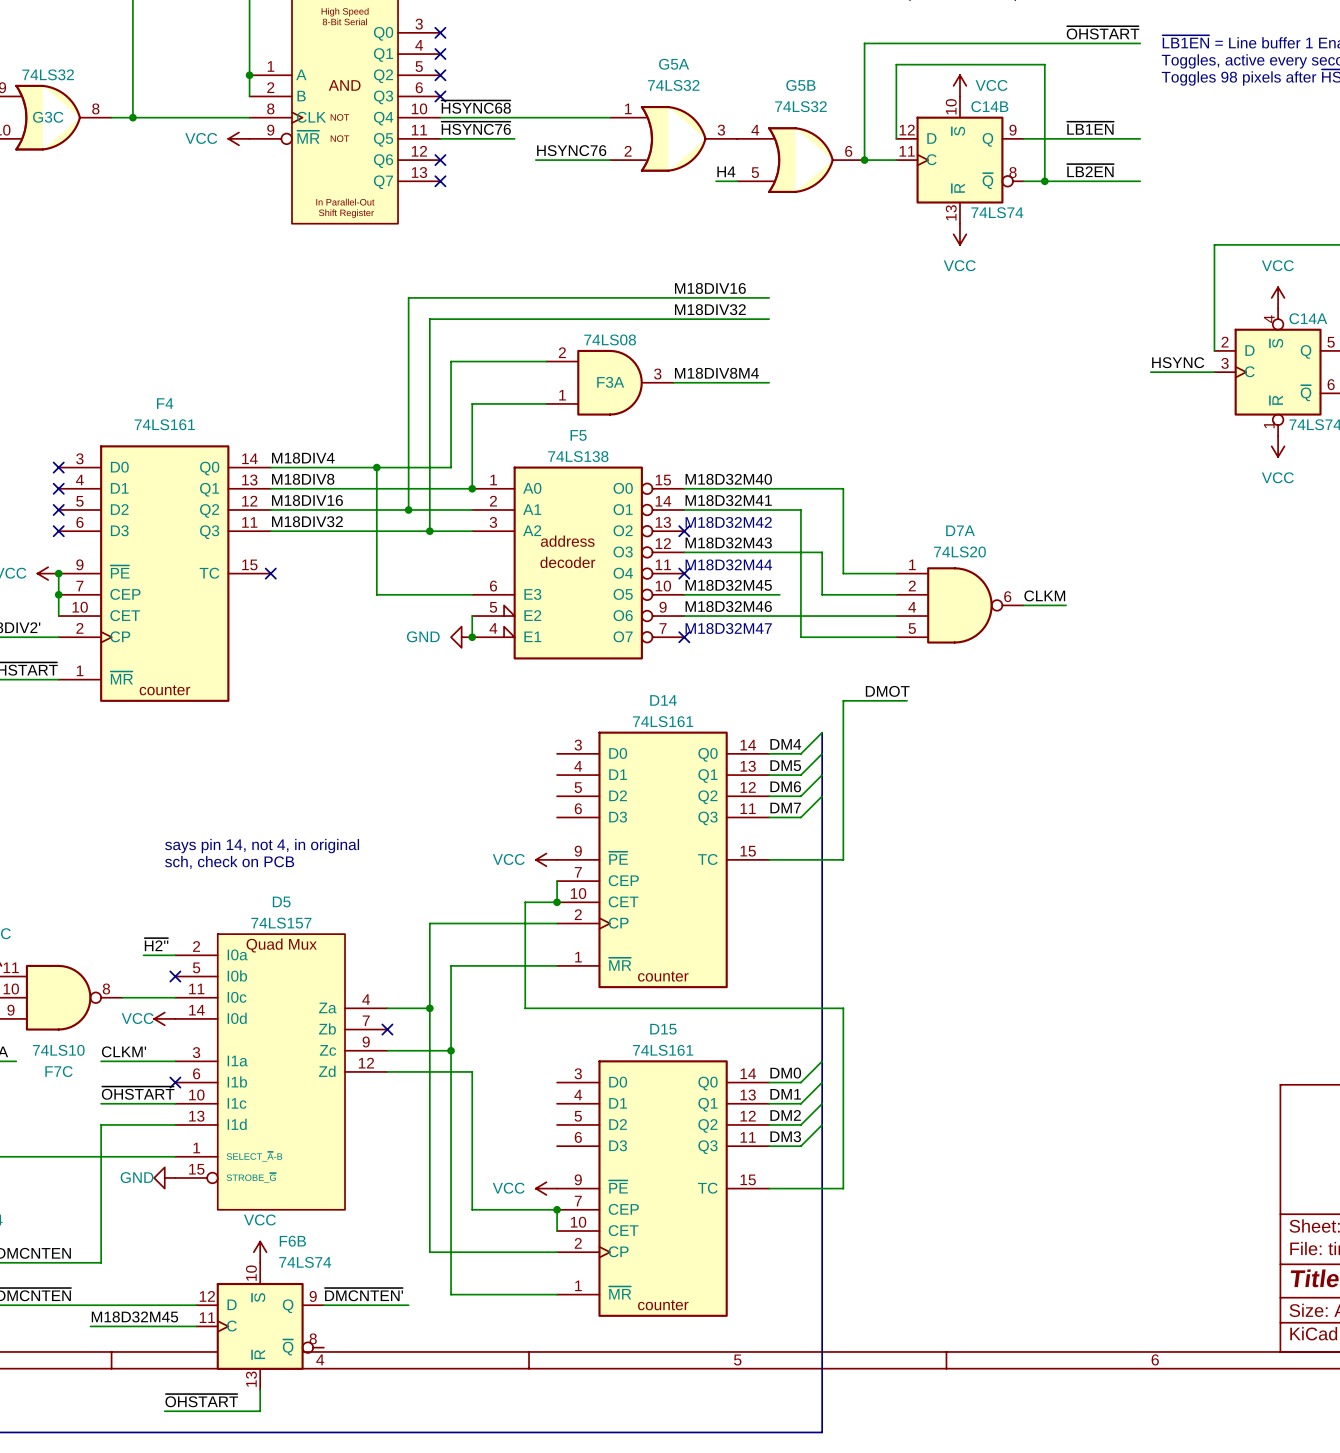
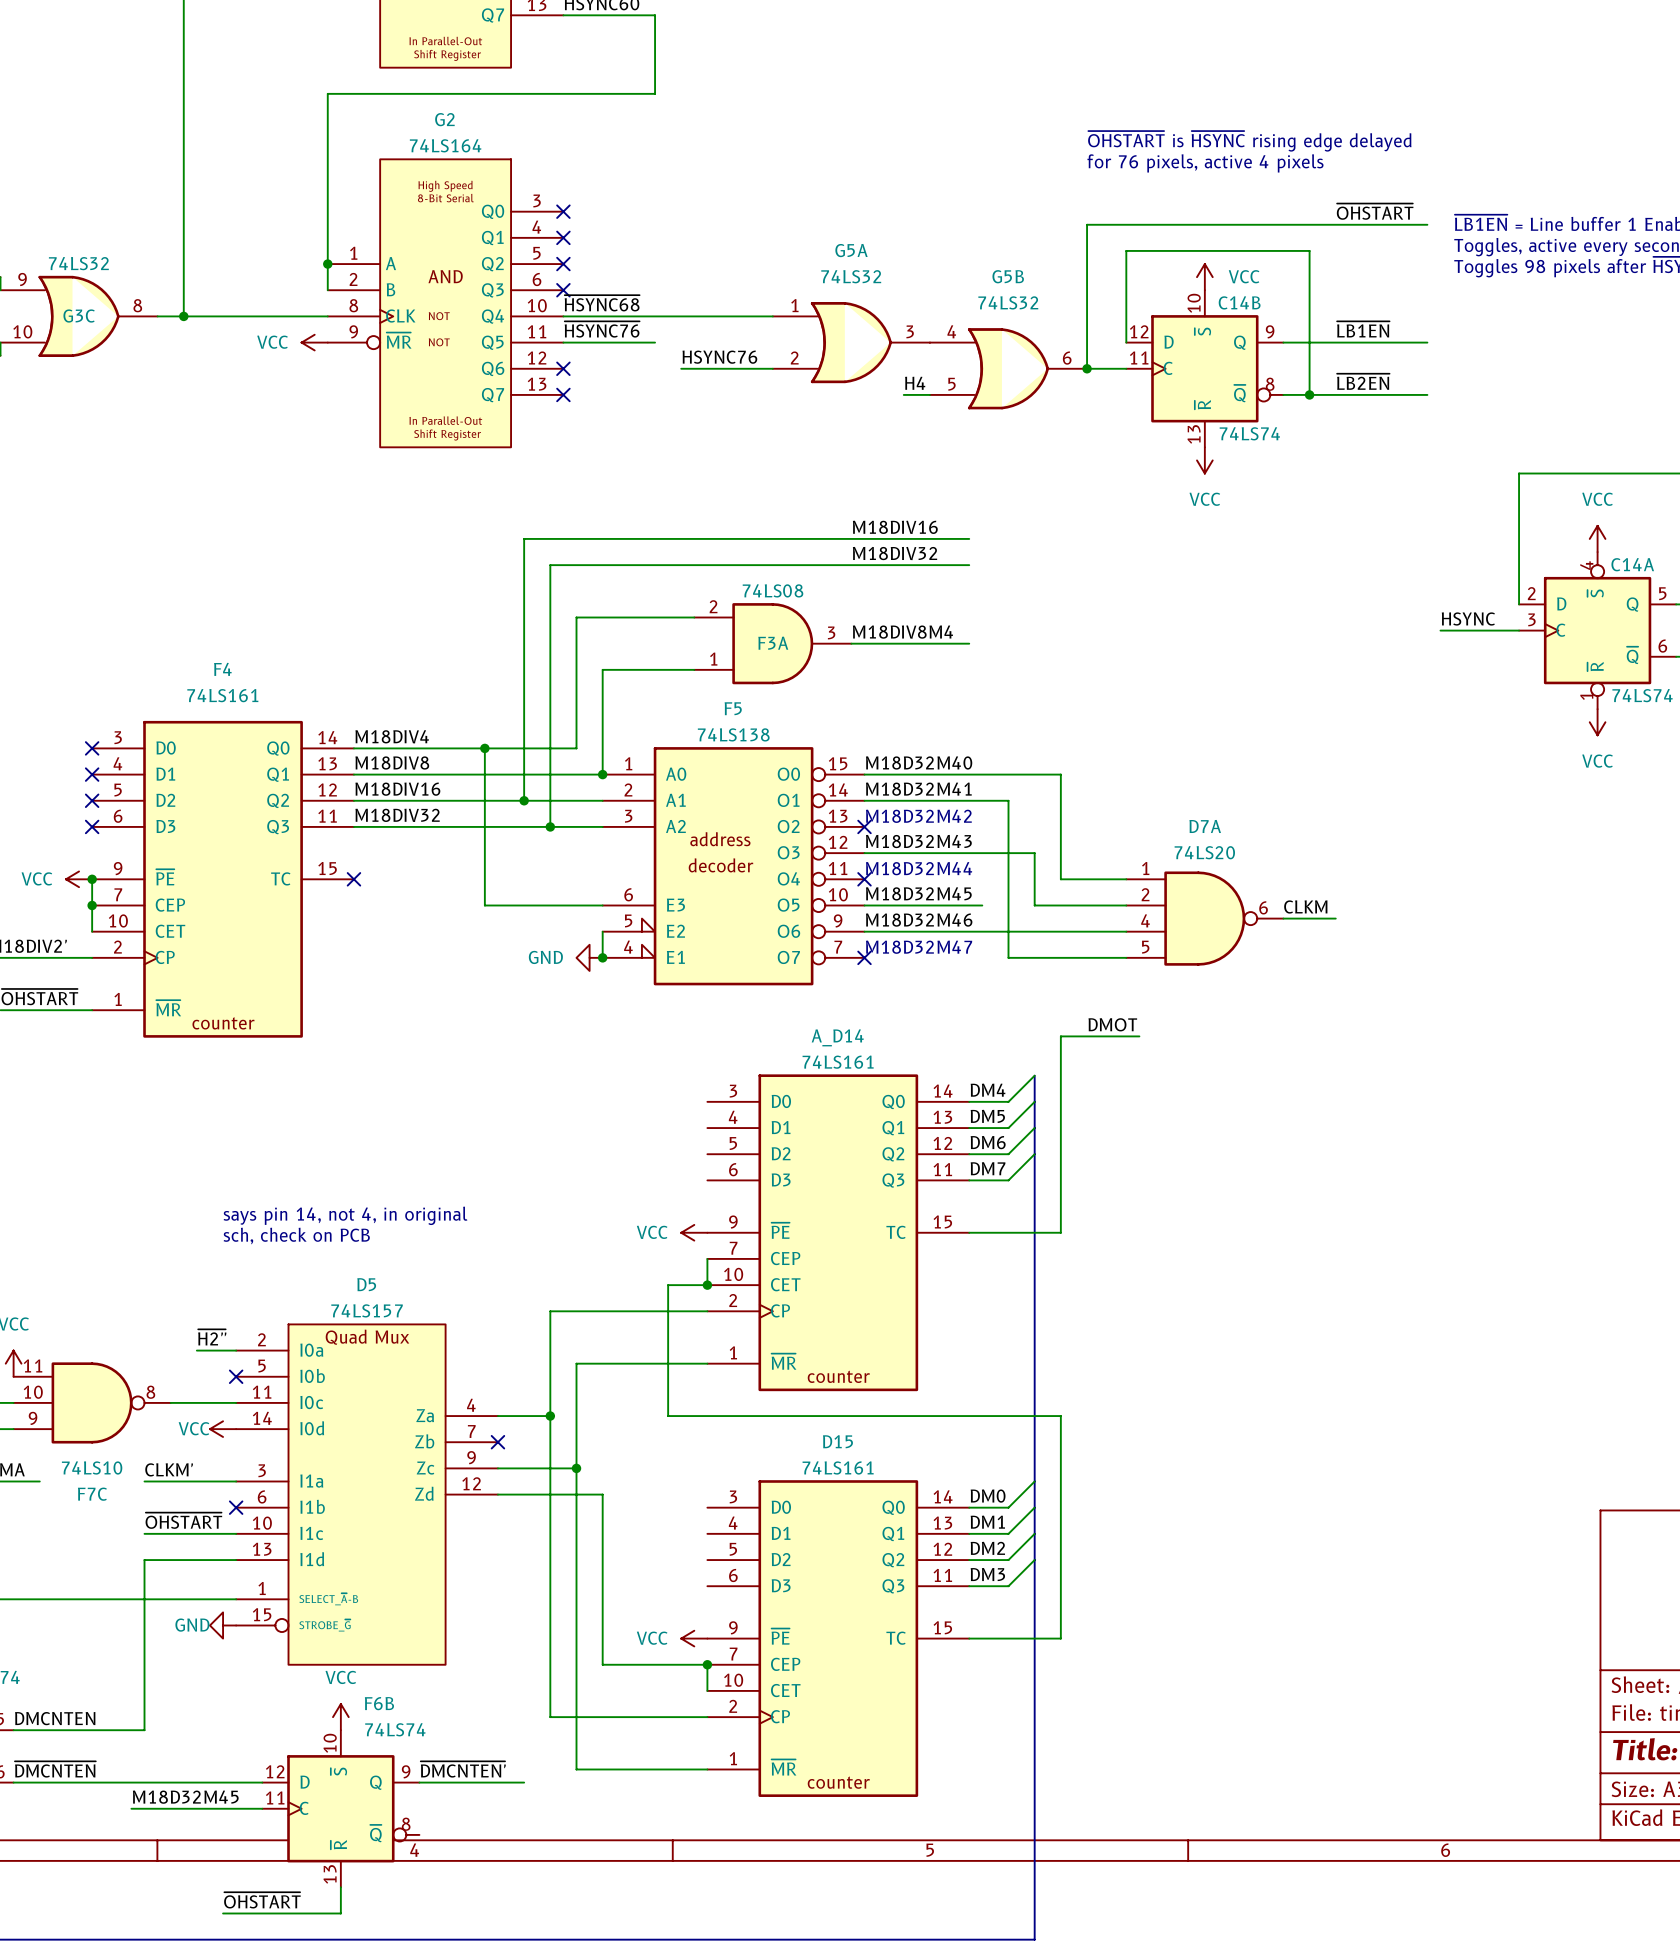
D14 name: D14 (663, 700) -> A_D14 (837, 1037)

